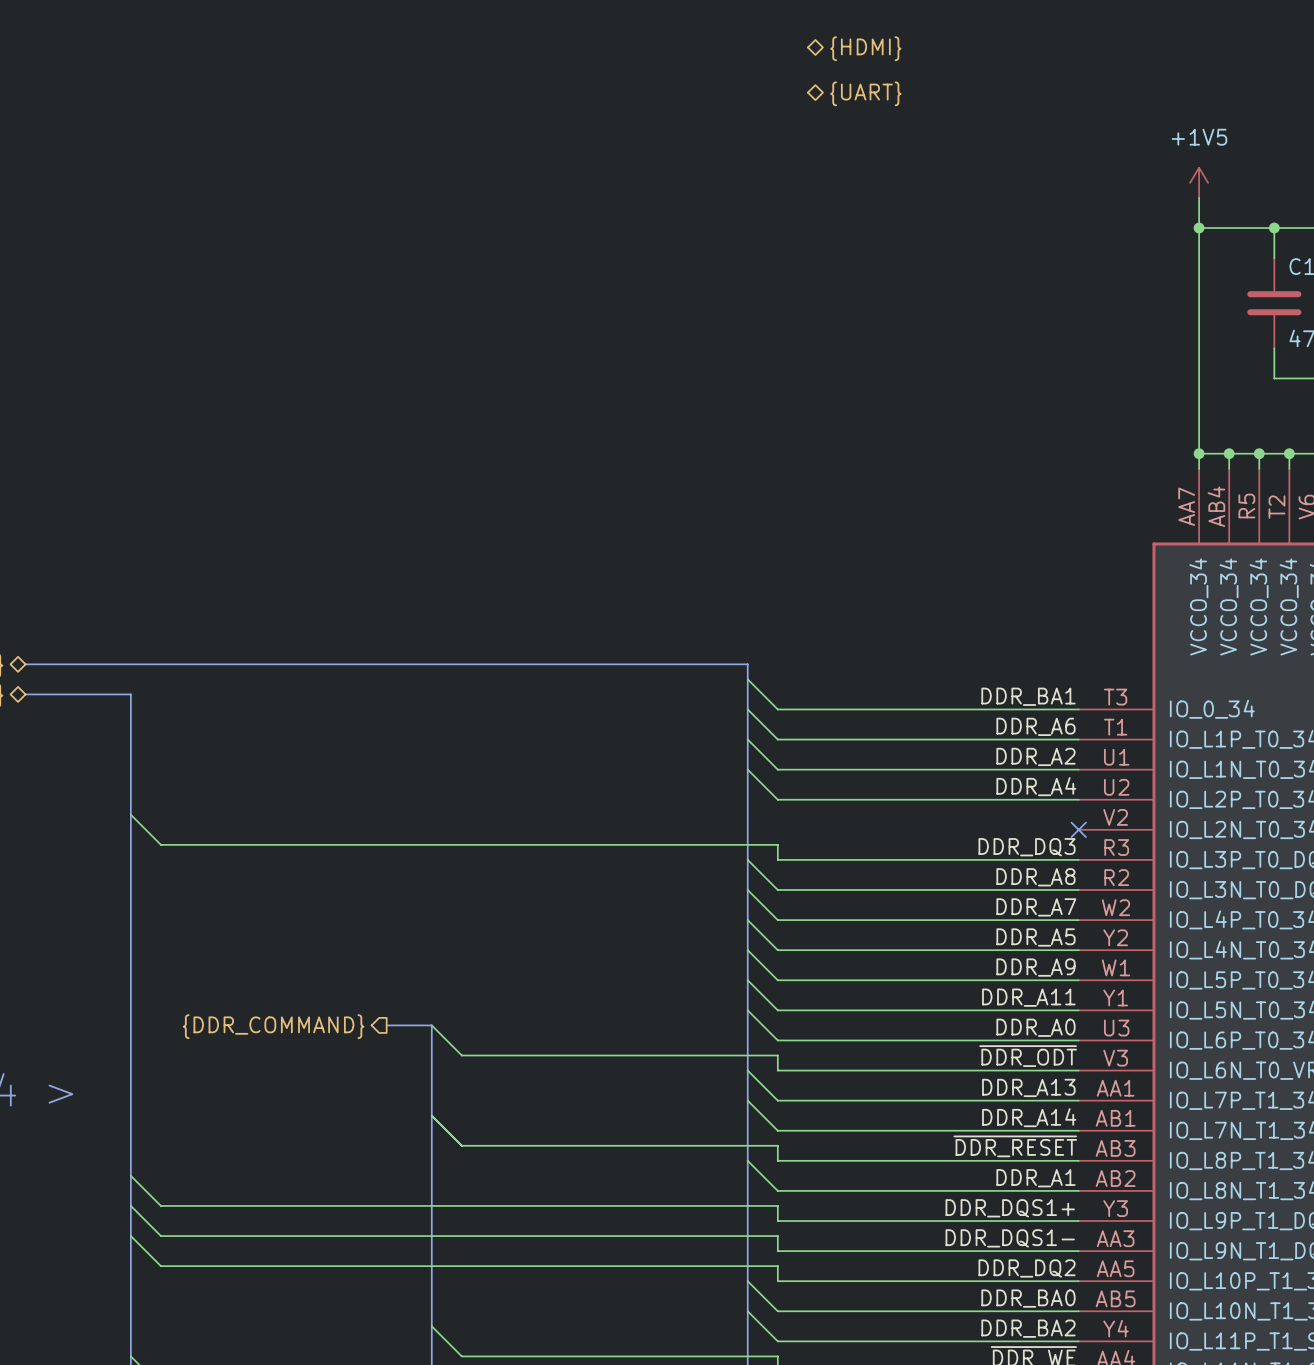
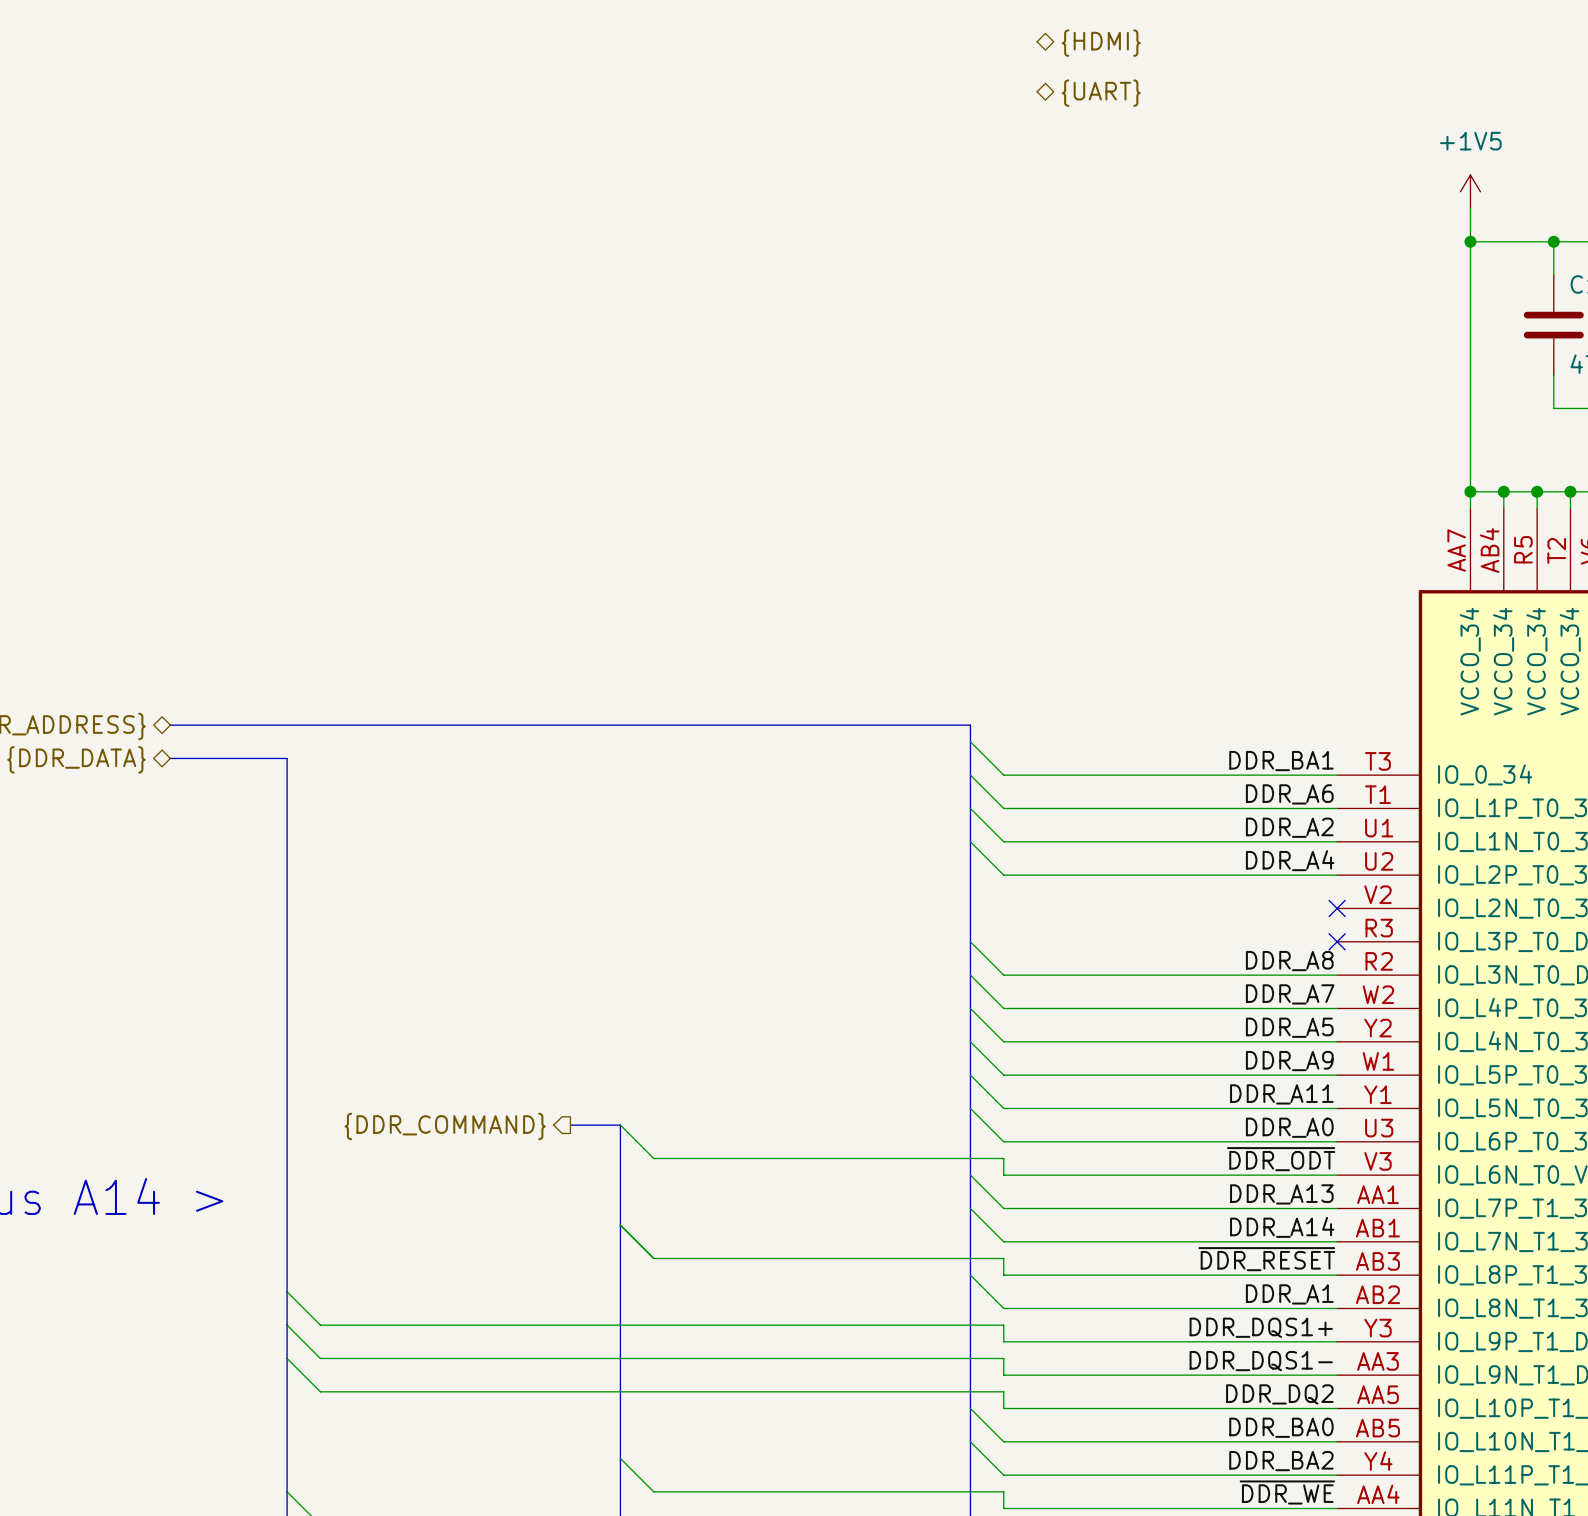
wire: (130, 814) (160, 844) (777, 844) (777, 859) (1078, 859) -> none
label: DDR_DQ3 (1027, 847) -> none
no-connect mark: none -> (1337, 941)

